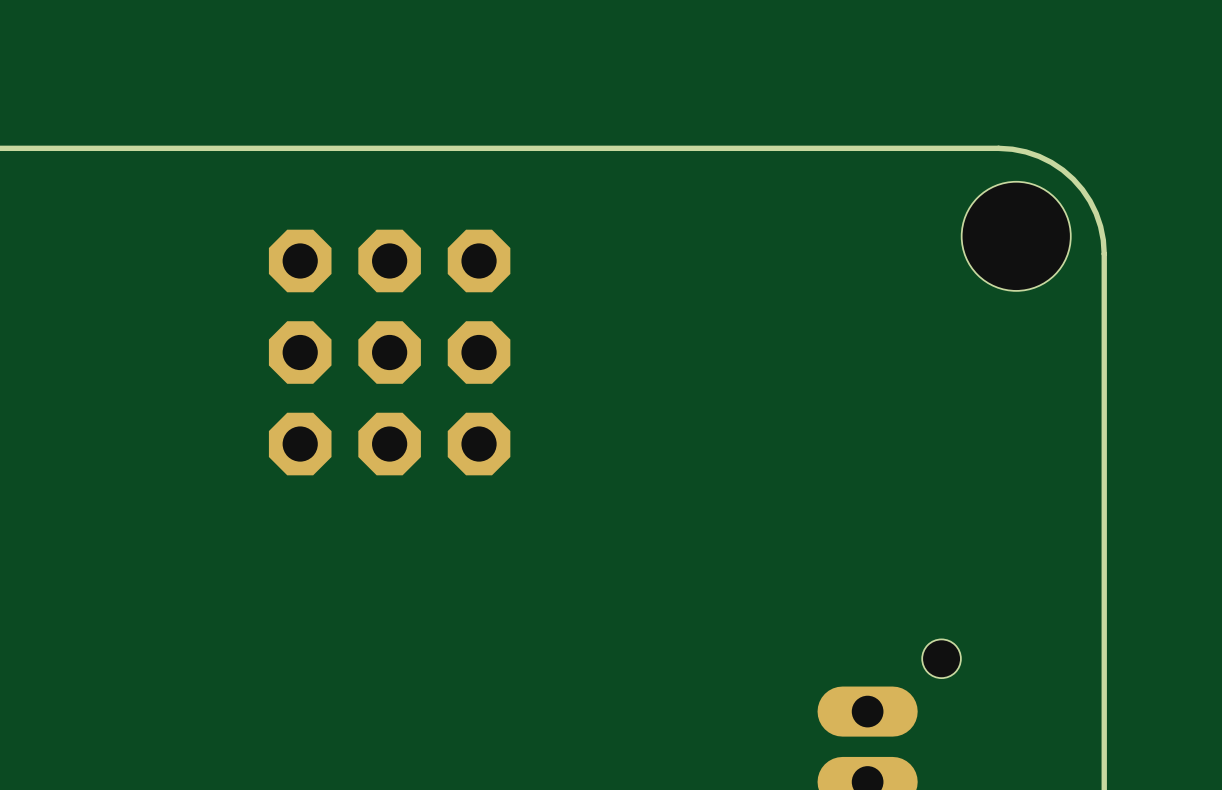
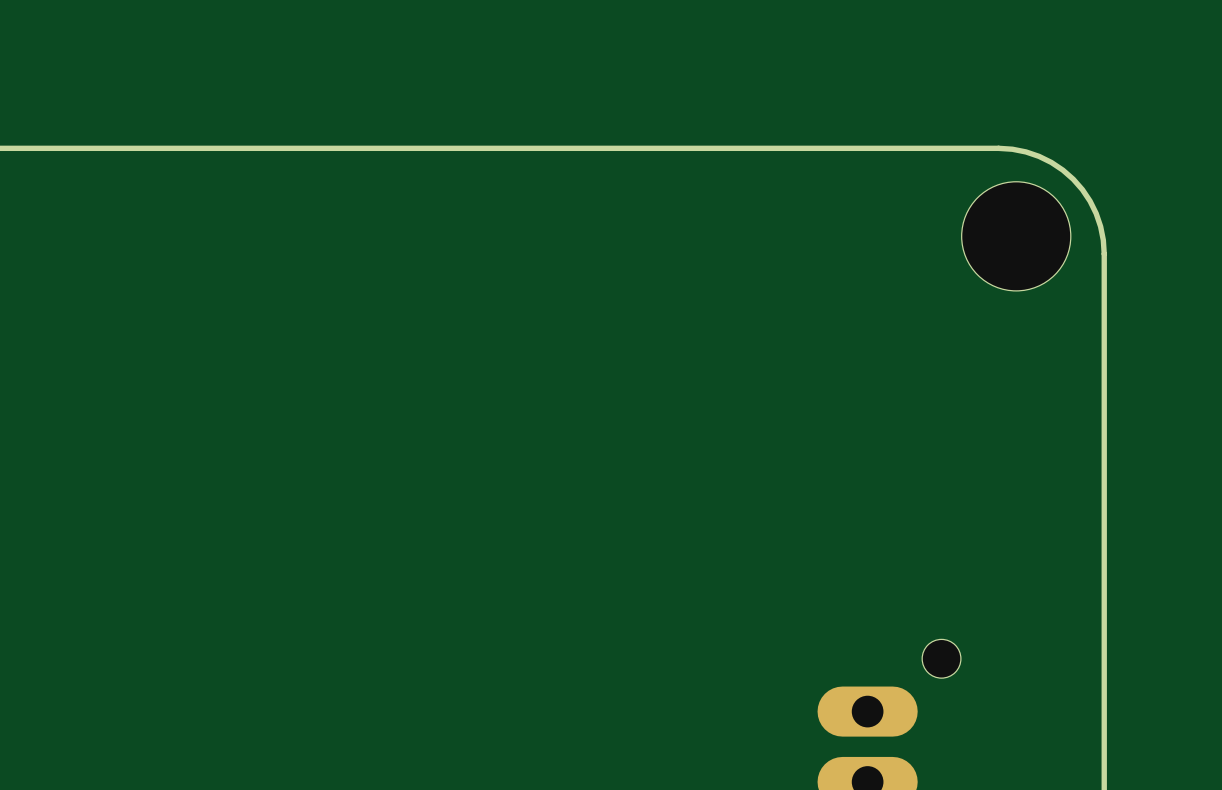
part: (389, 260) -> none
part: (389, 352) -> none
part: (389, 444) -> none

